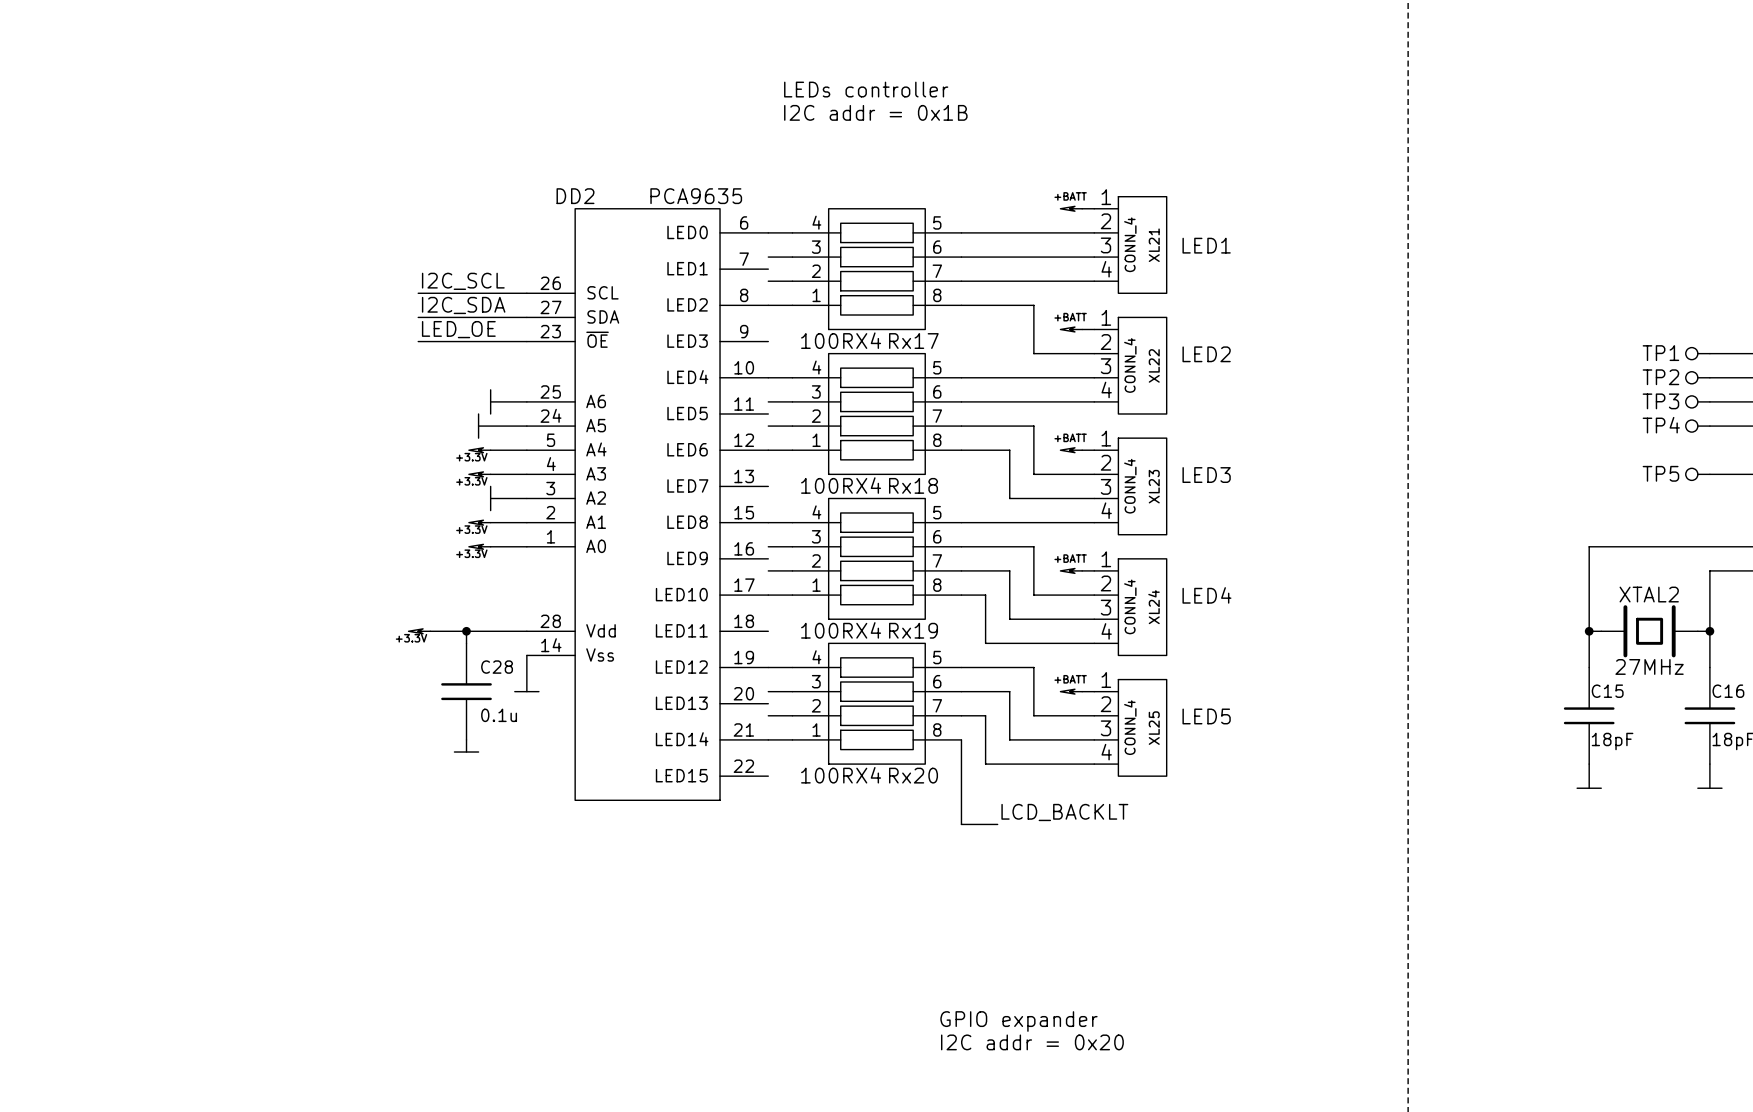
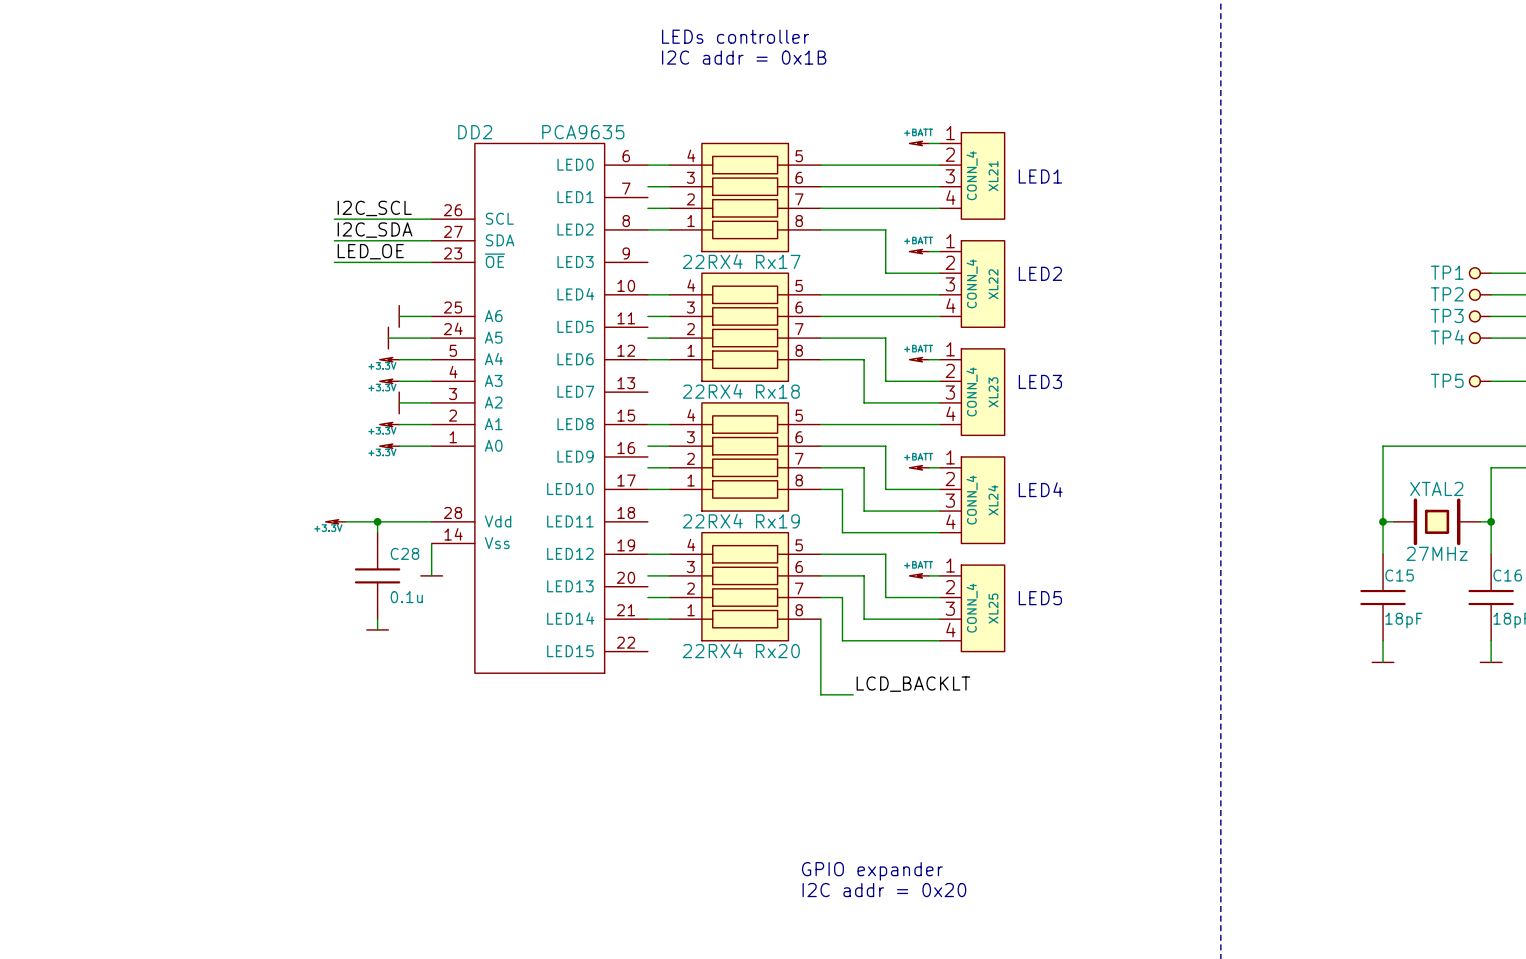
Rx17 value: 100RX4 (841, 340) -> 22RX4 (712, 261)
Rx18 value: 100RX4 (841, 485) -> 22RX4 (712, 391)
Rx19 value: 100RX4 (841, 630) -> 22RX4 (712, 521)
Rx20 value: 100RX4 (841, 775) -> 22RX4 (712, 650)

